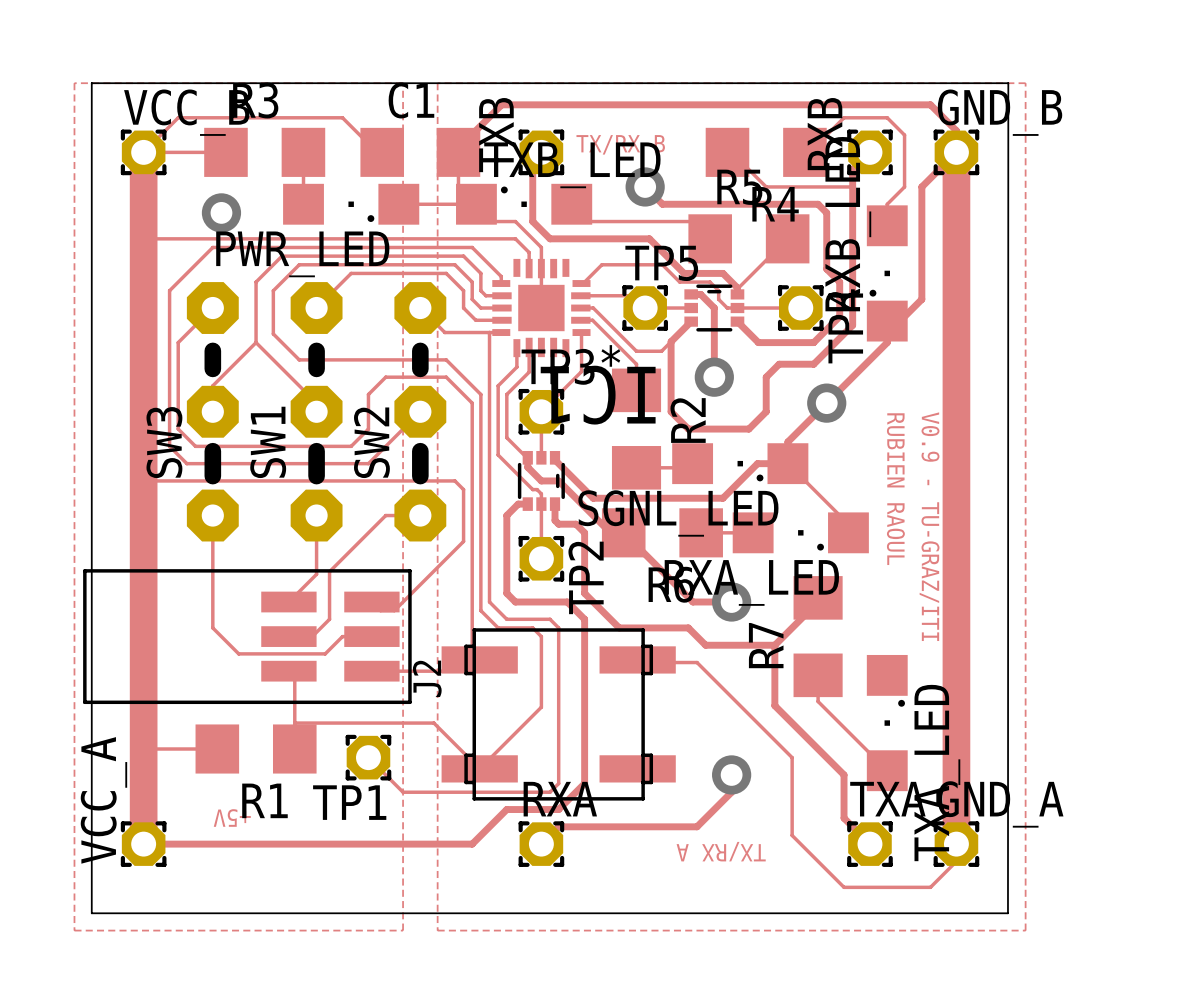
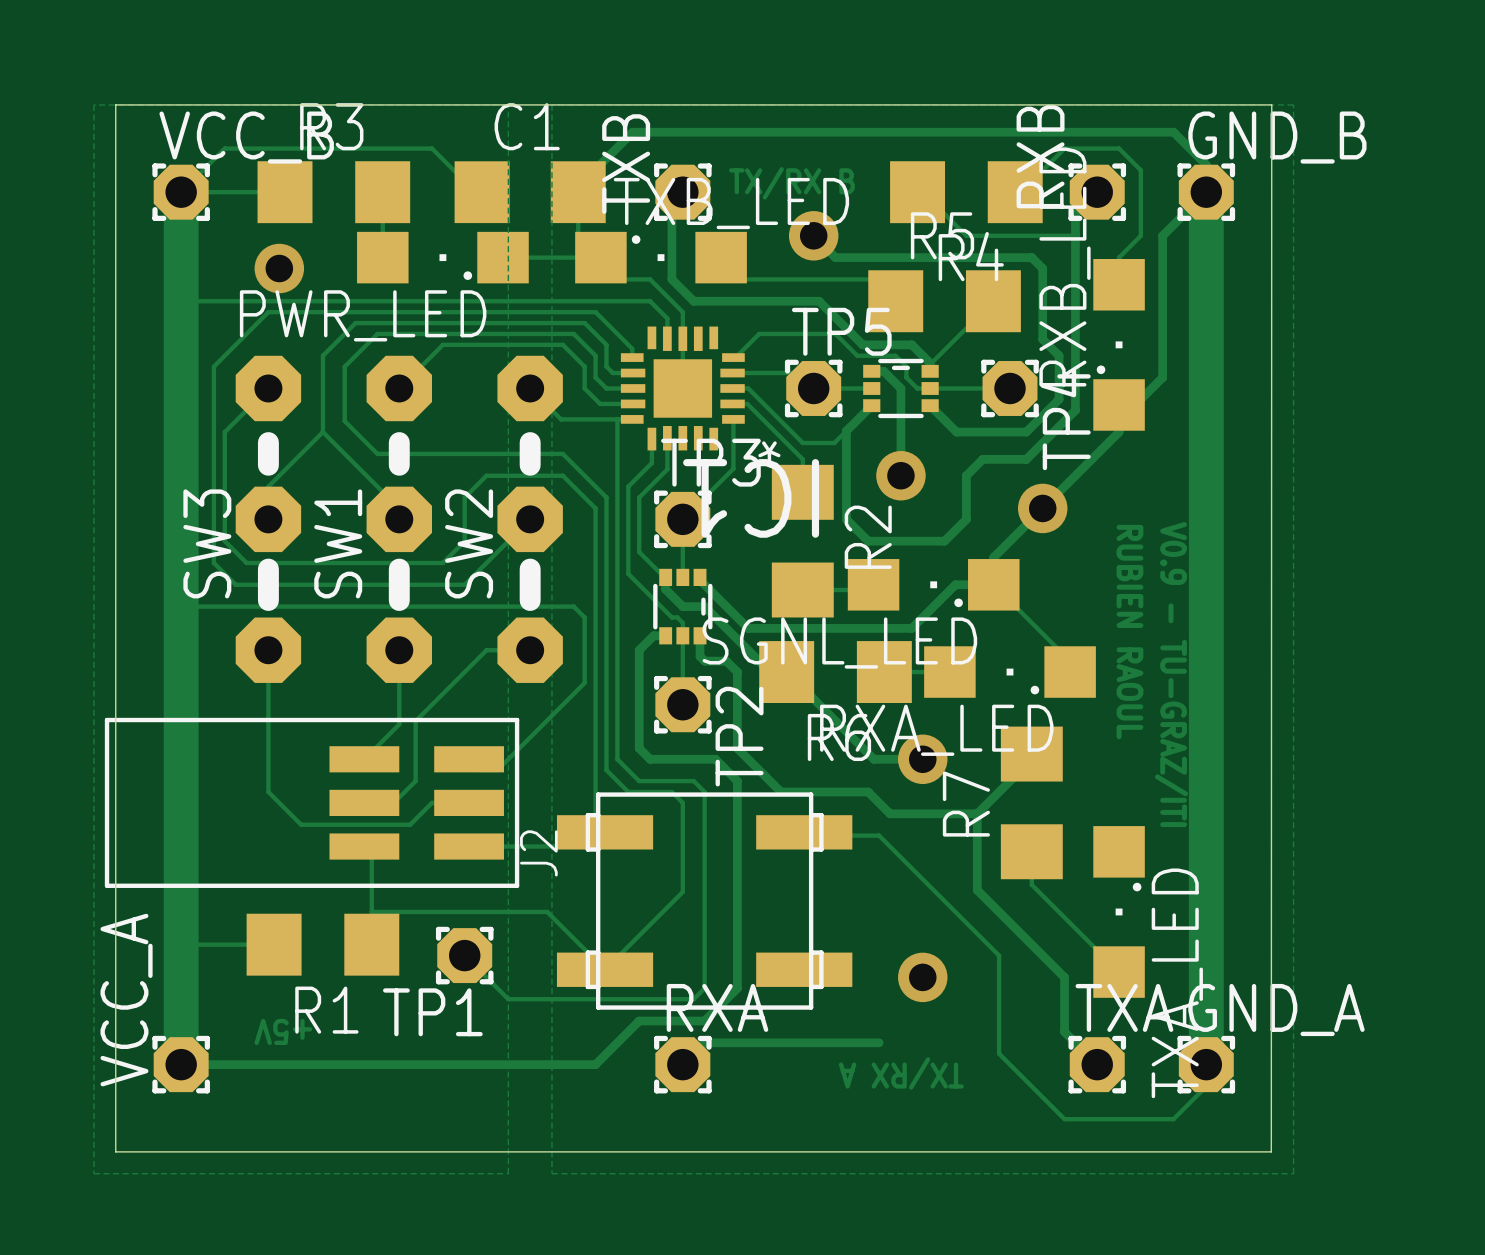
track: (731, 774) (731, 792) (697, 826) -> none

